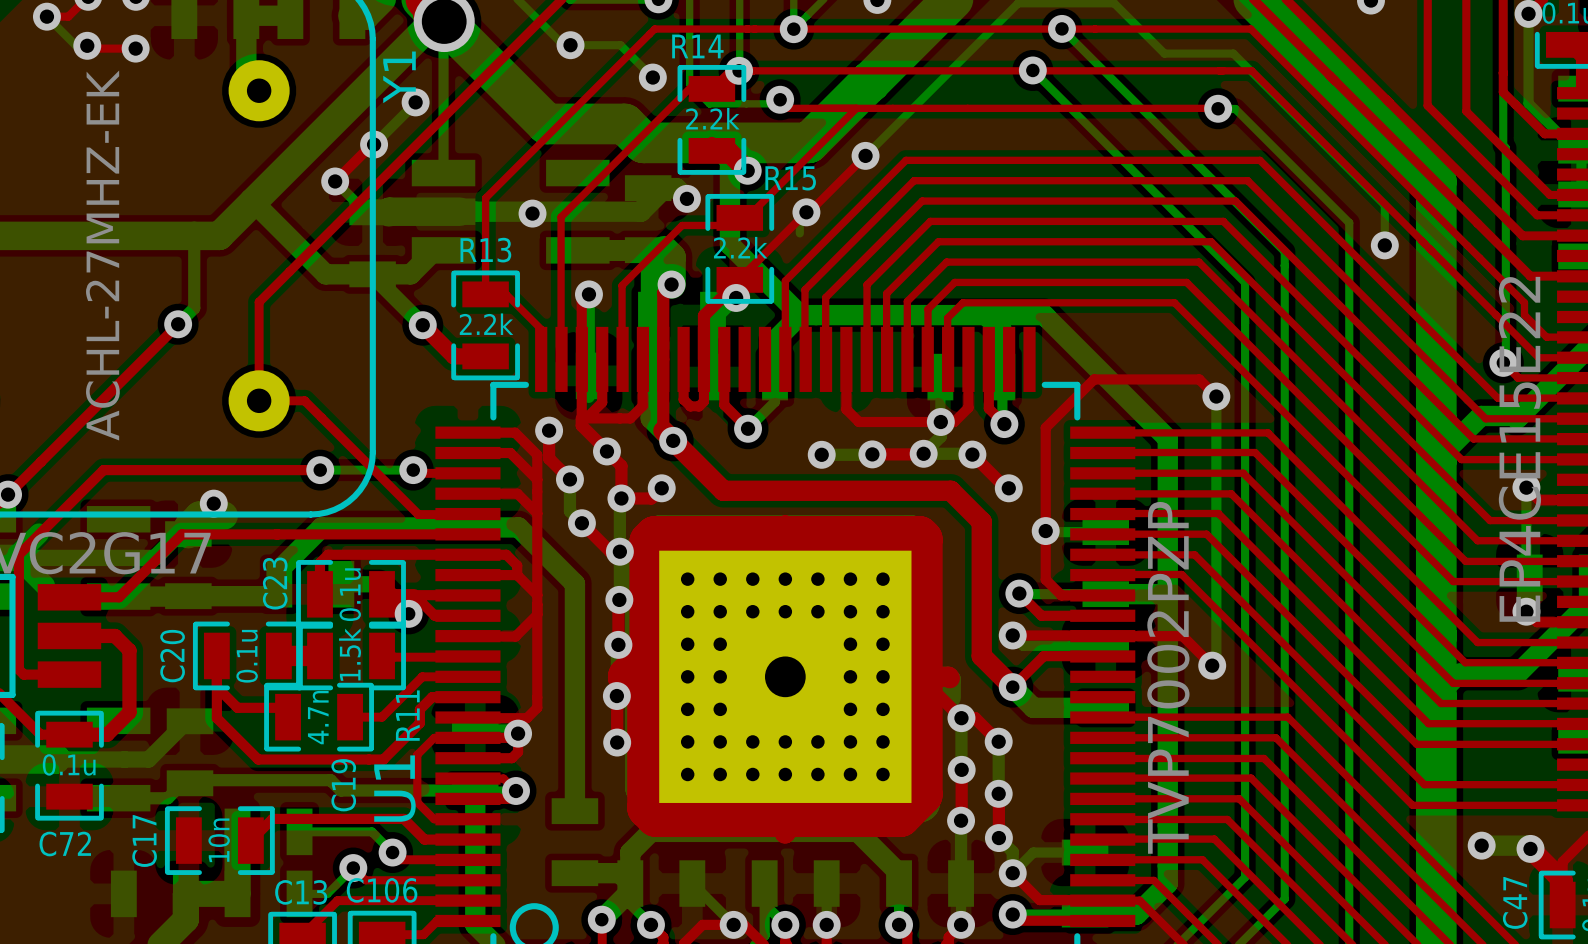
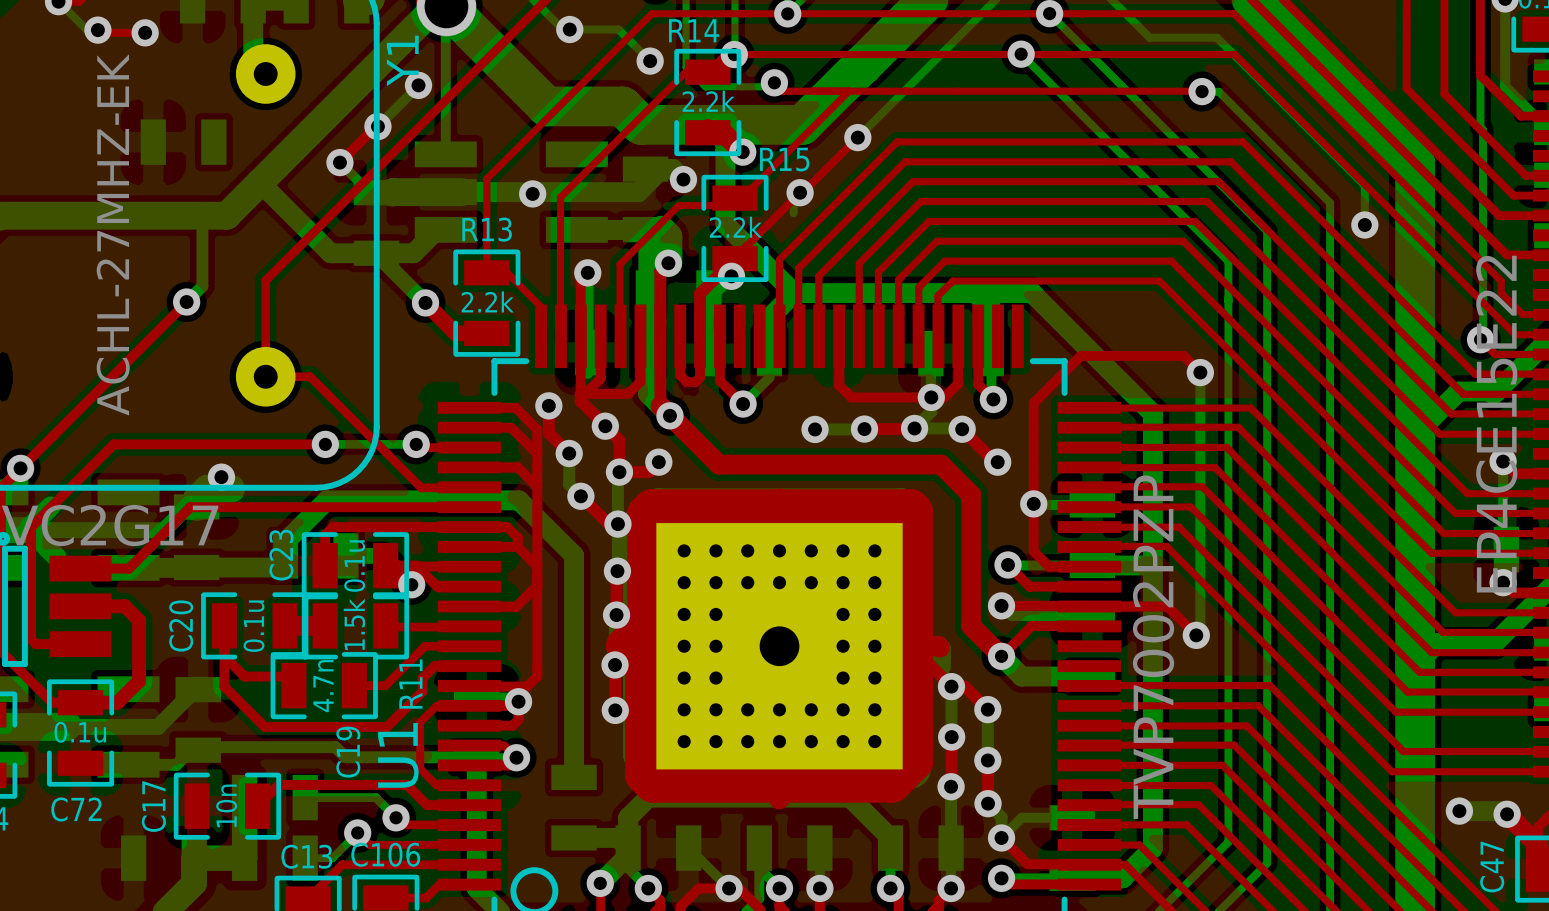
part: none -> (183, 142)

